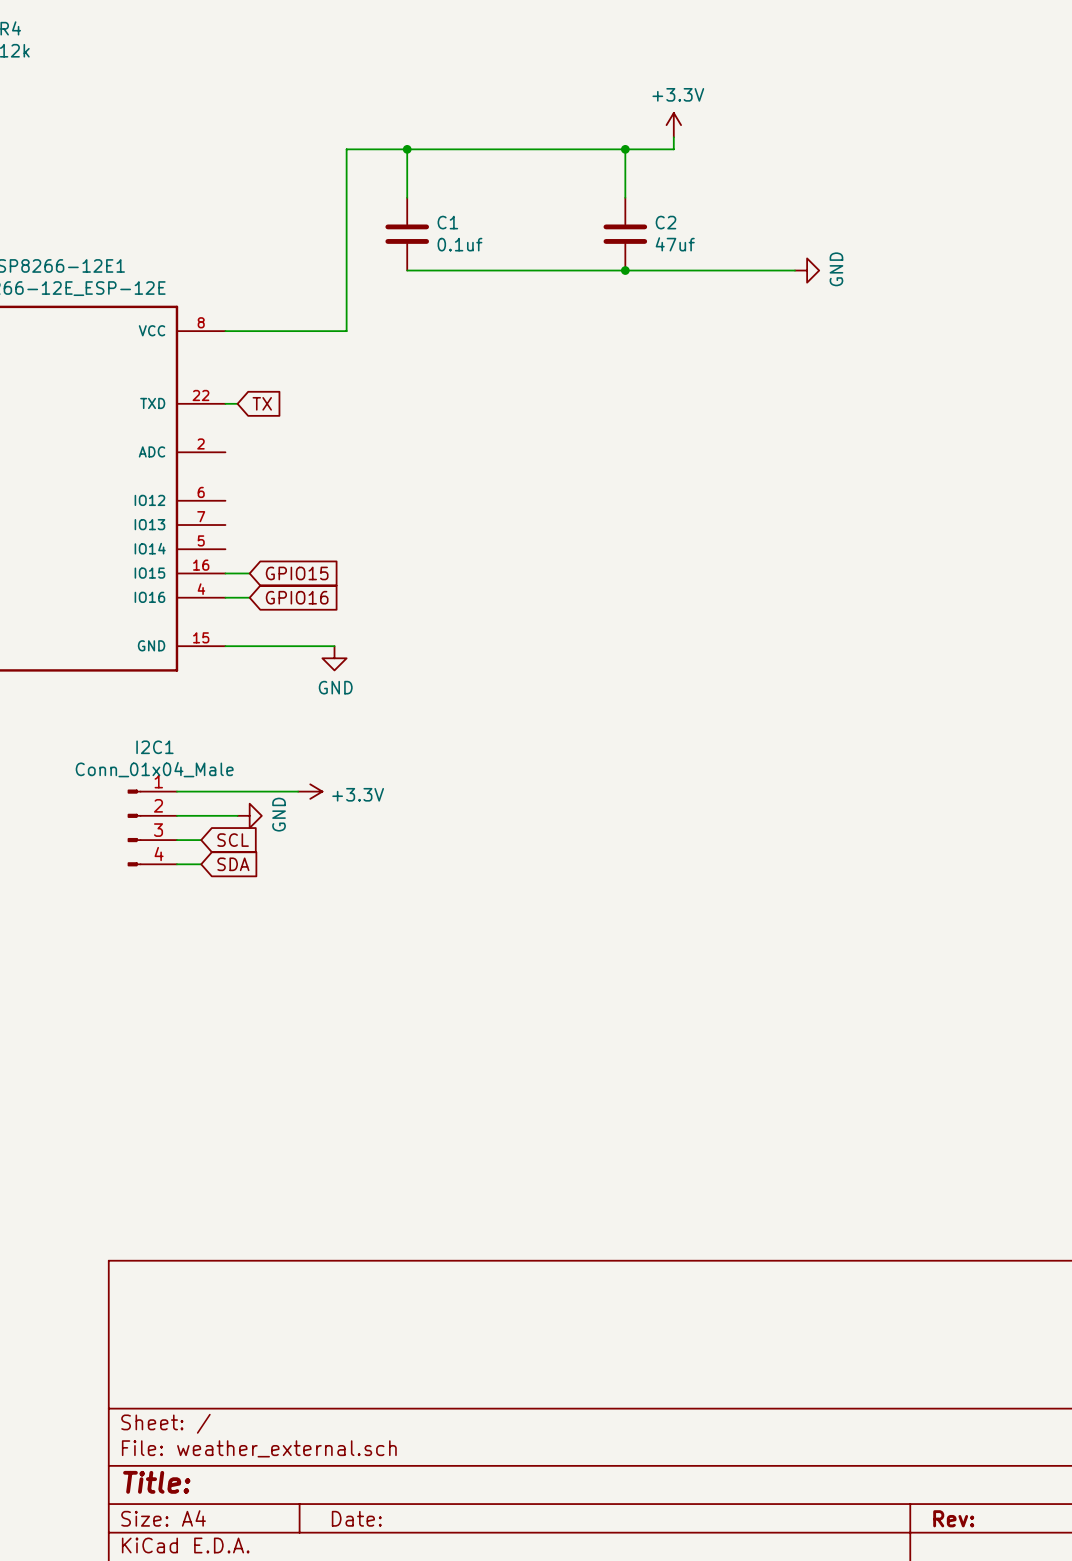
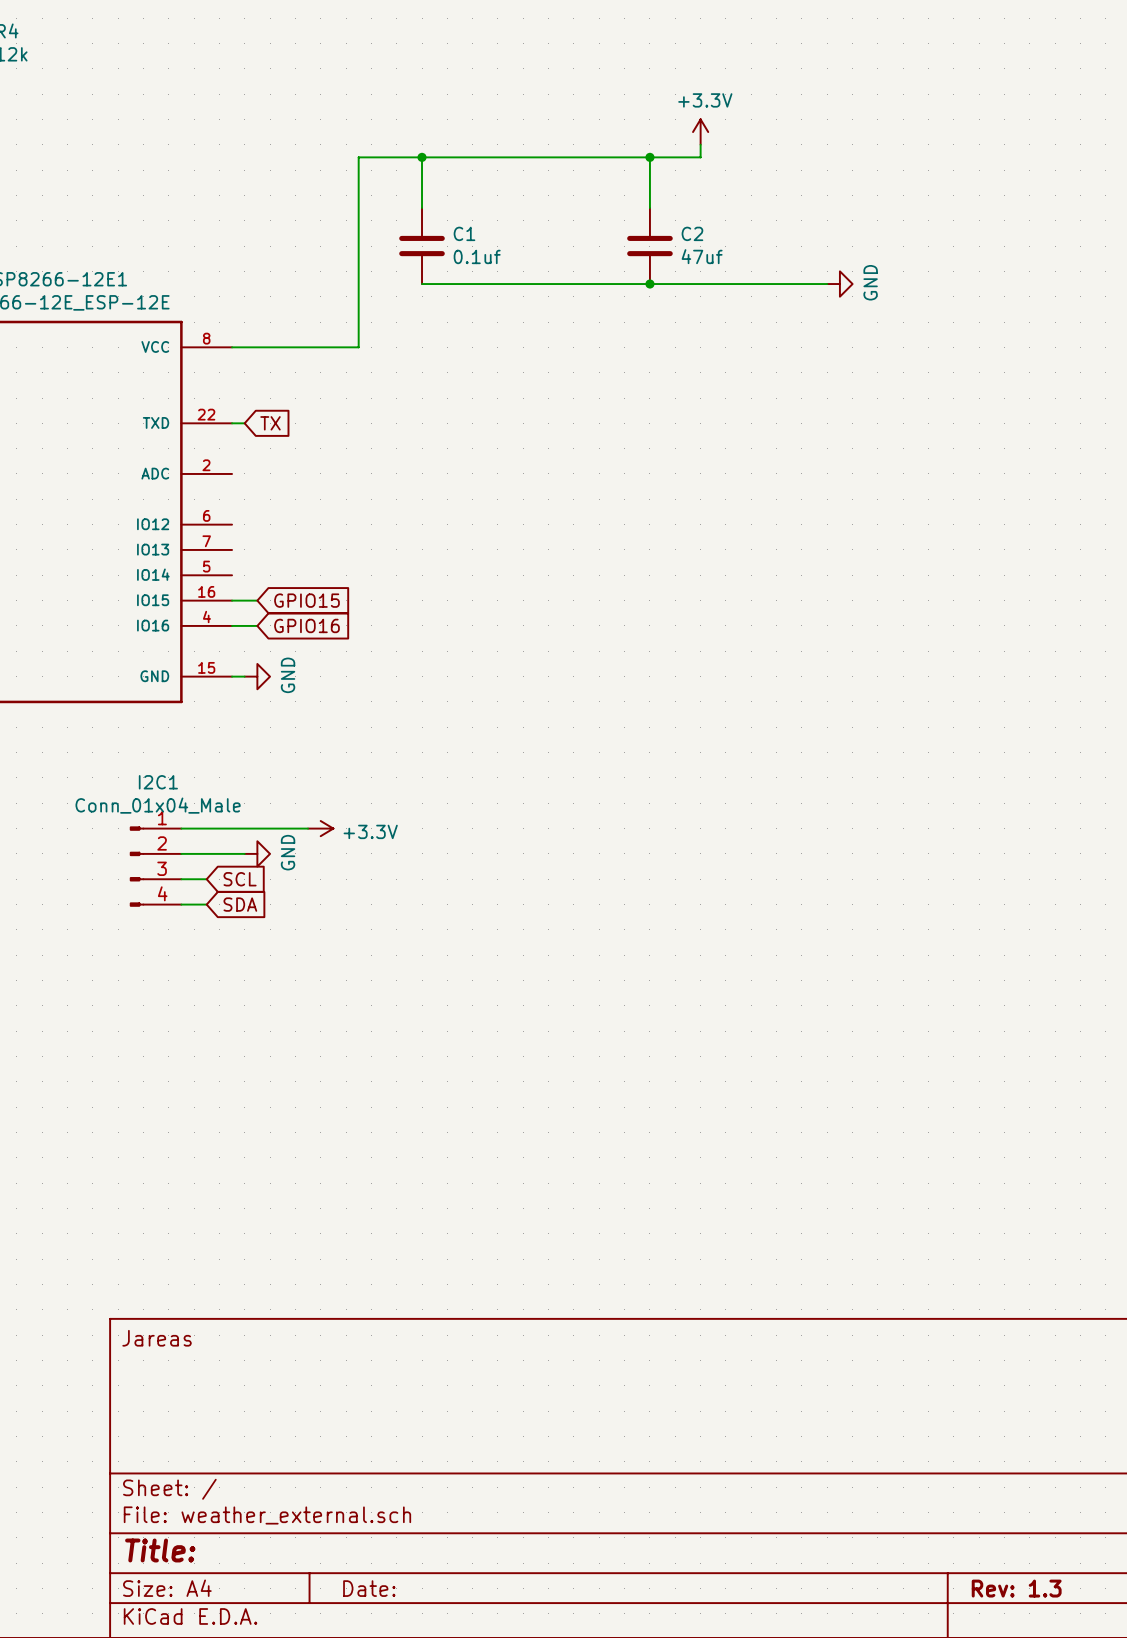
wire: (237, 646) (334, 646) -> none
power symbol rotation: 0° (334, 658) -> 90° counterclockwise (257, 676)
power symbol position: GND (334, 658) -> GND (257, 676)
title block: none -> Jareas (157, 1338)
title block: Rev: (953, 1518) -> Rev: 1.3 (1016, 1588)

